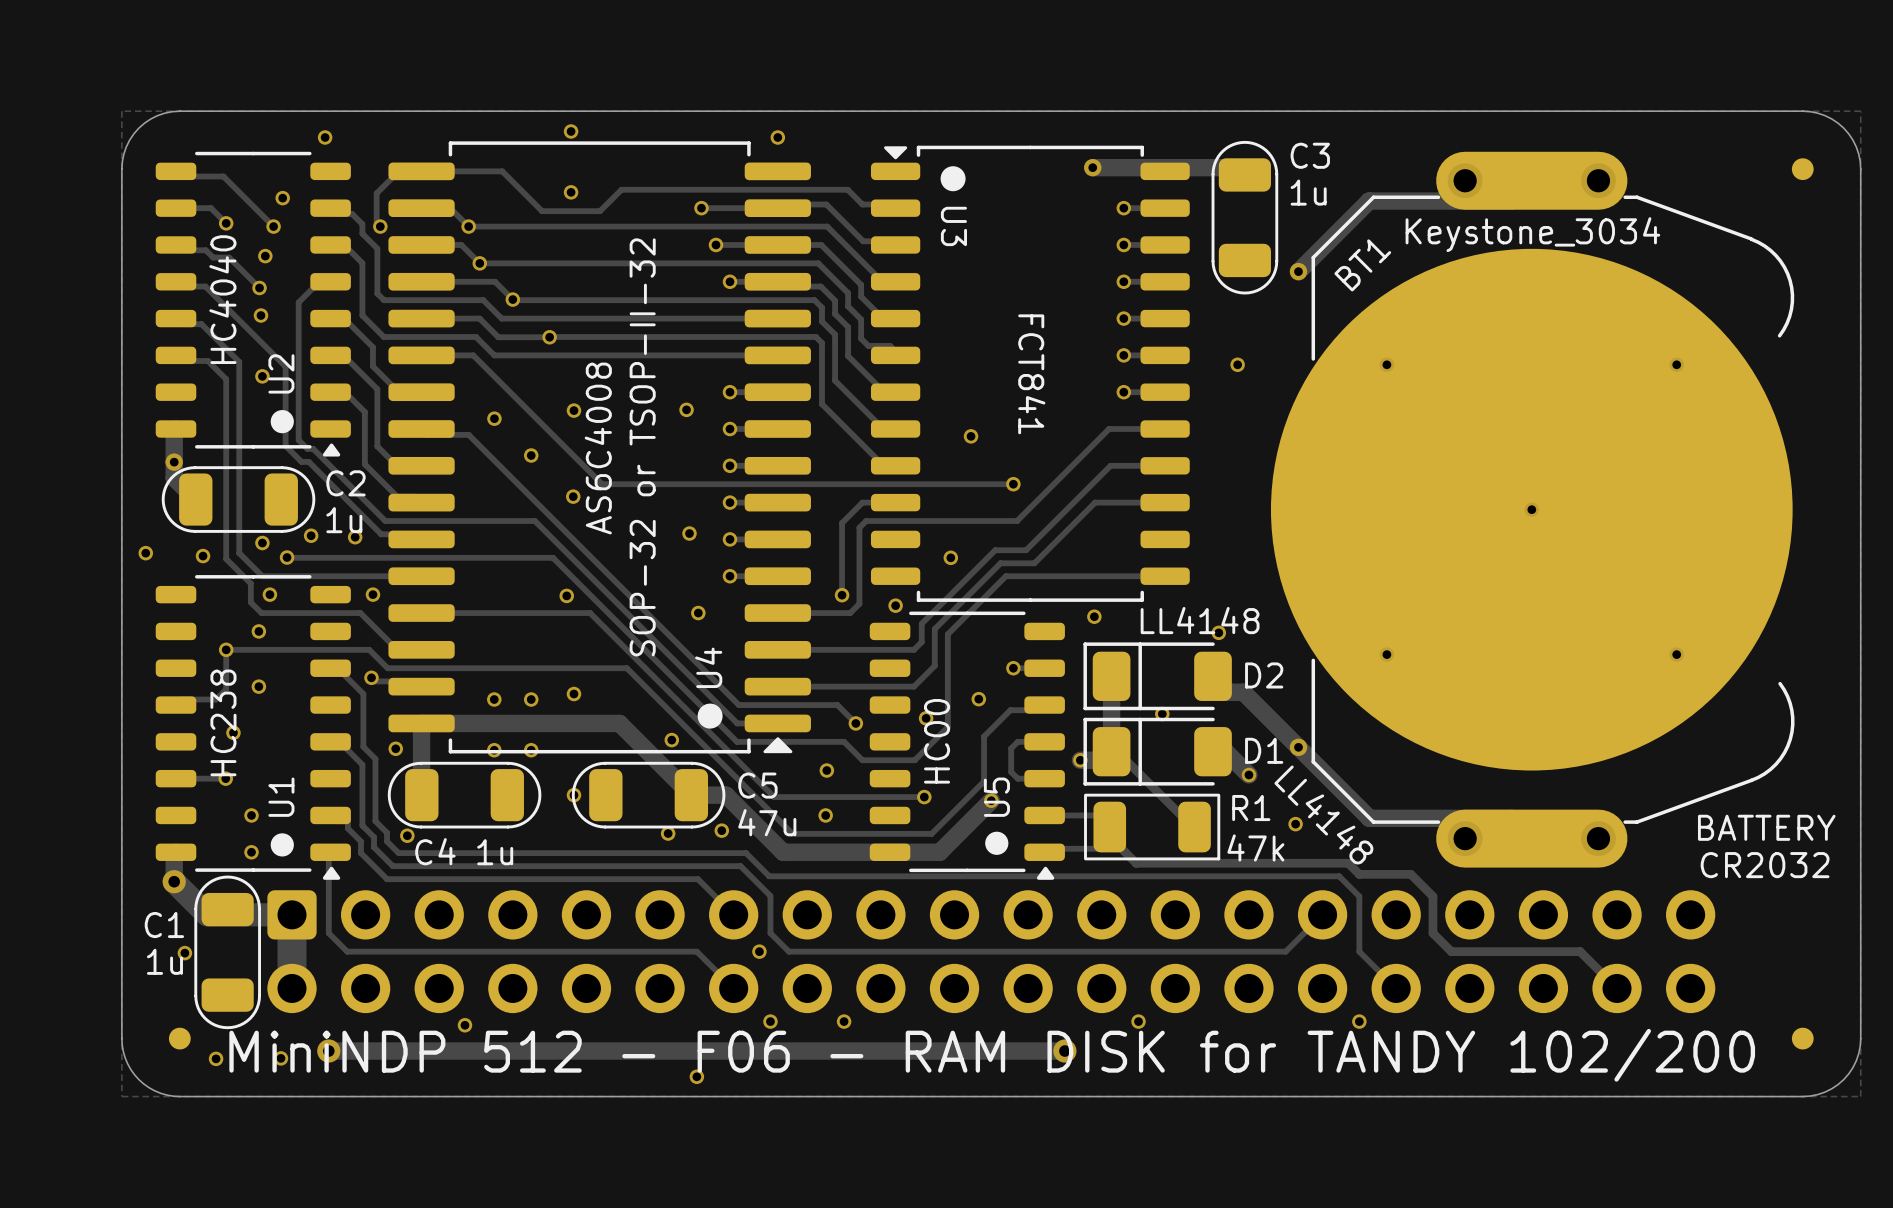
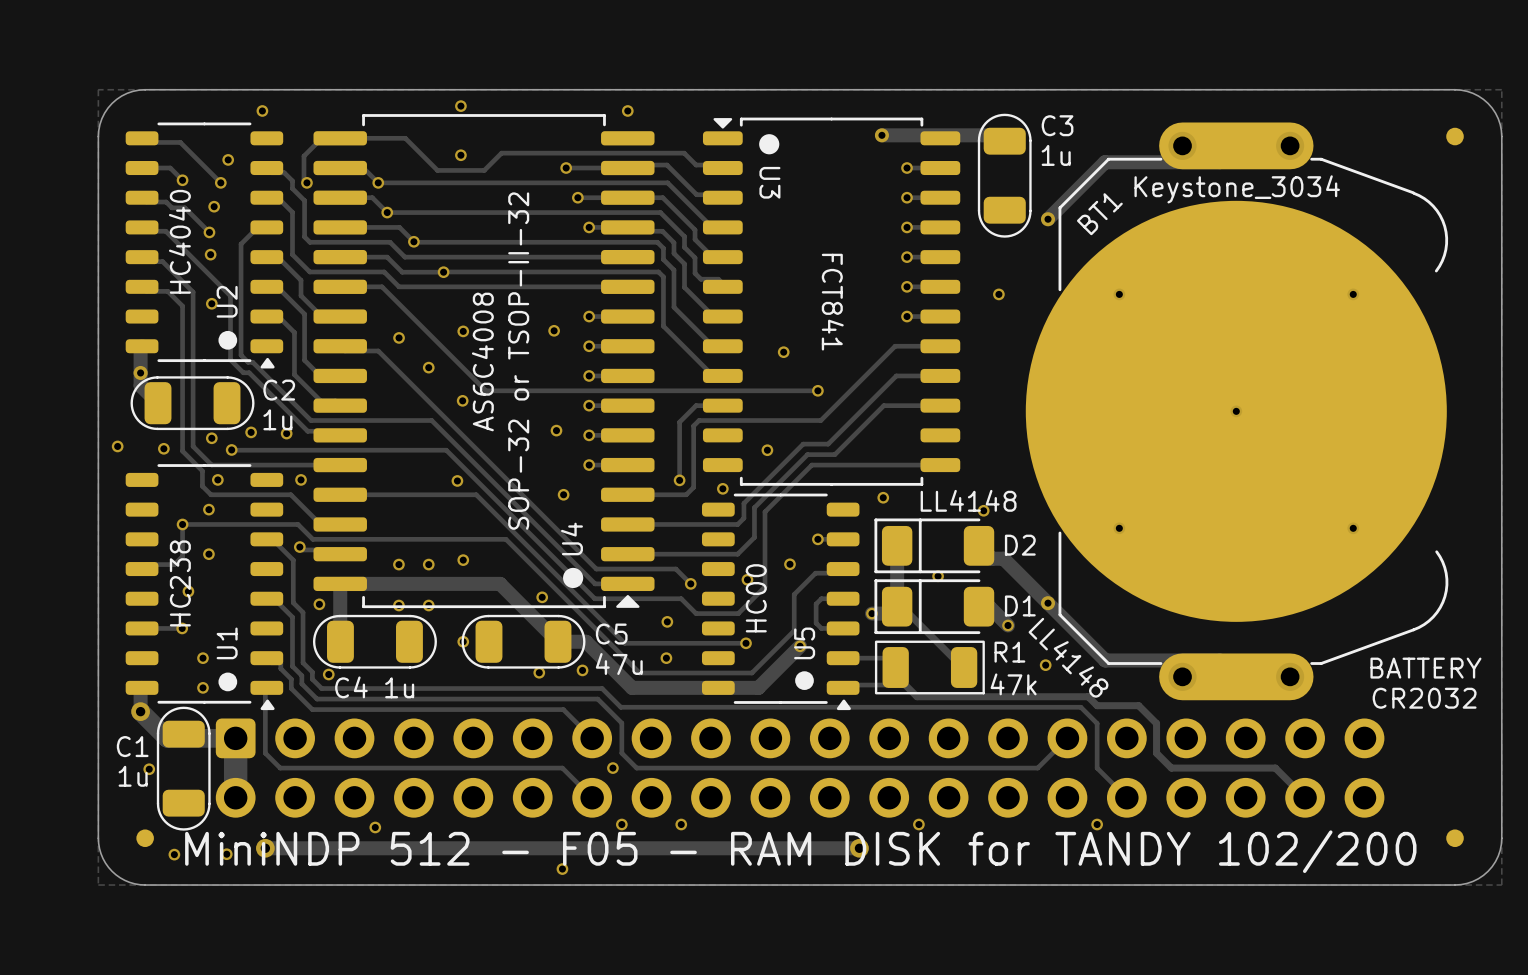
text: MiniNDP 512 - F06 - RAM DISK for TANDY 102/200 (992, 1055) -> MiniNDP 512 - F05 - RAM DISK for TANDY 102/200 (800, 851)

